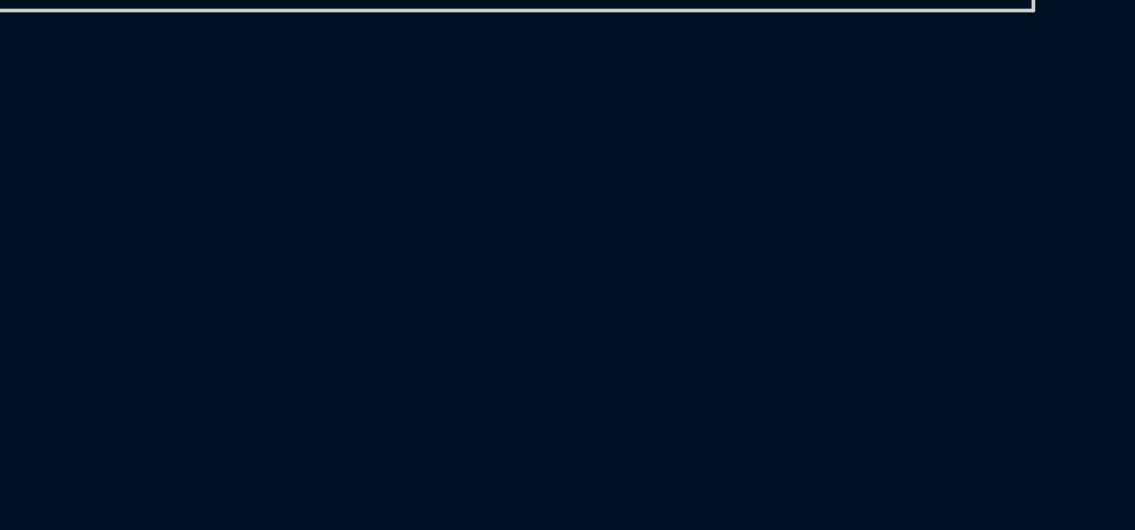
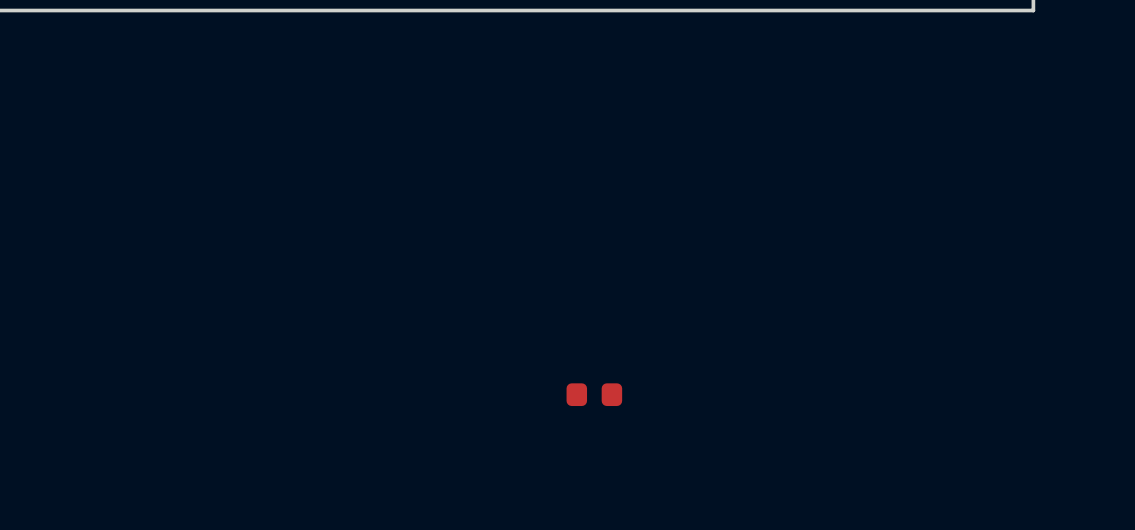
part: none -> (594, 394)

